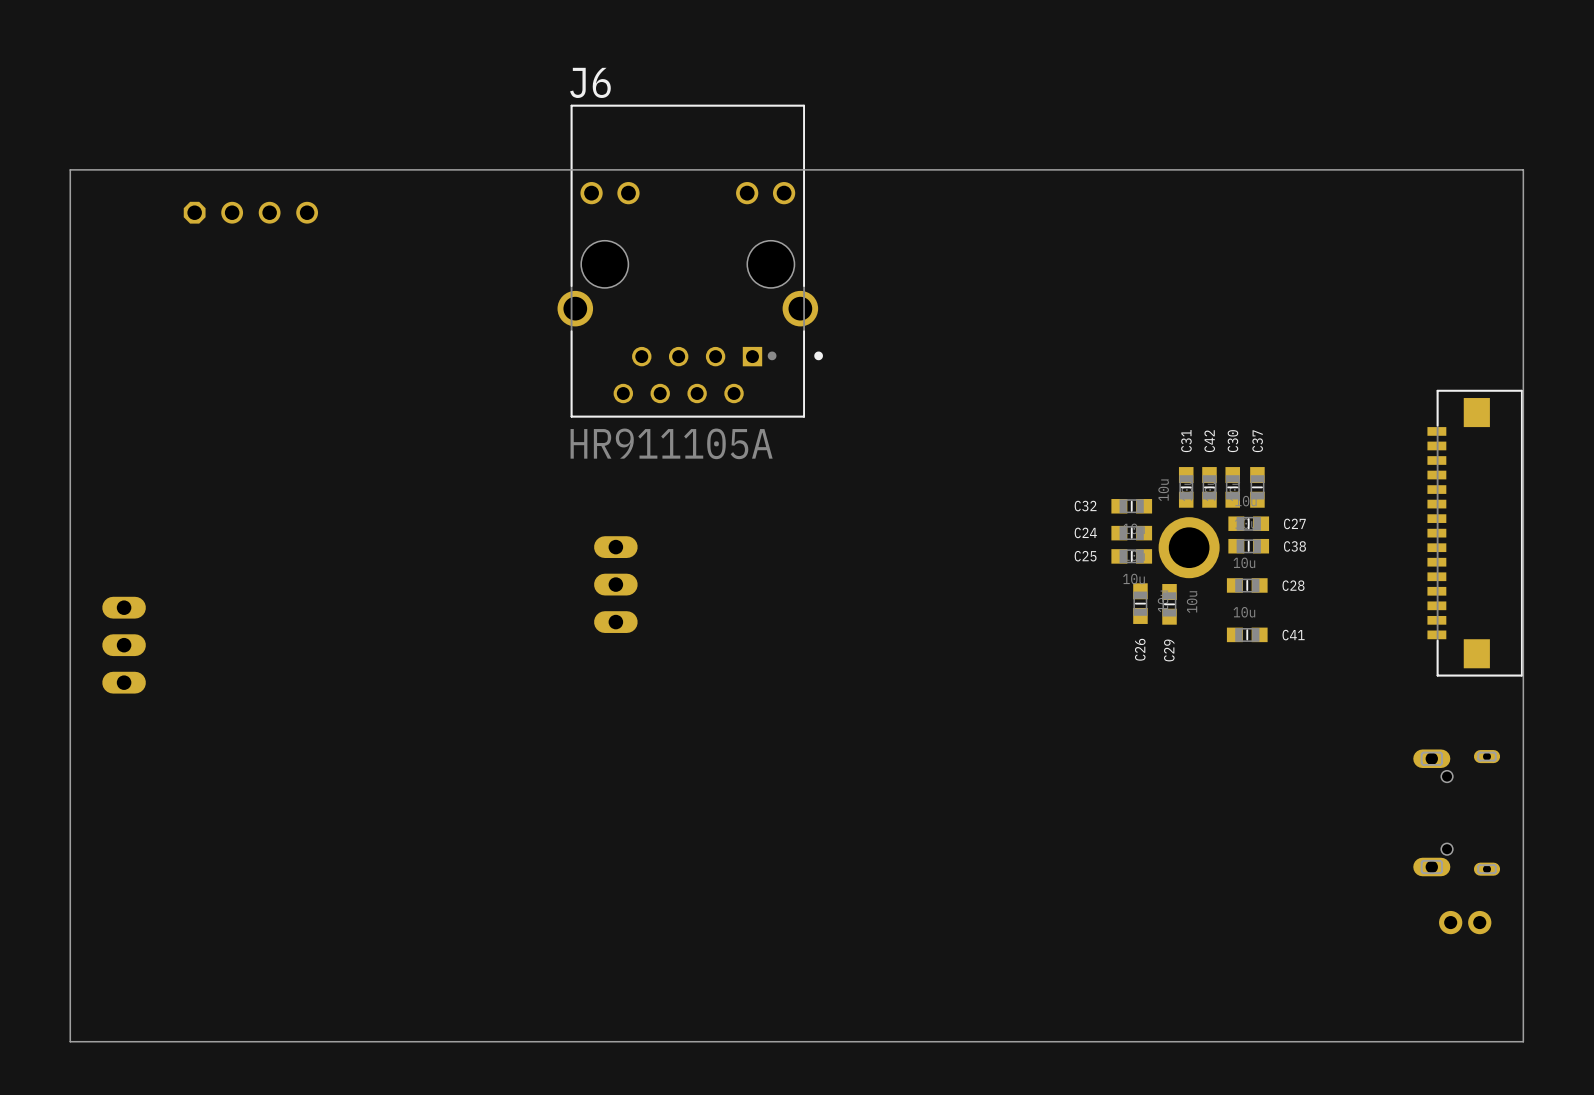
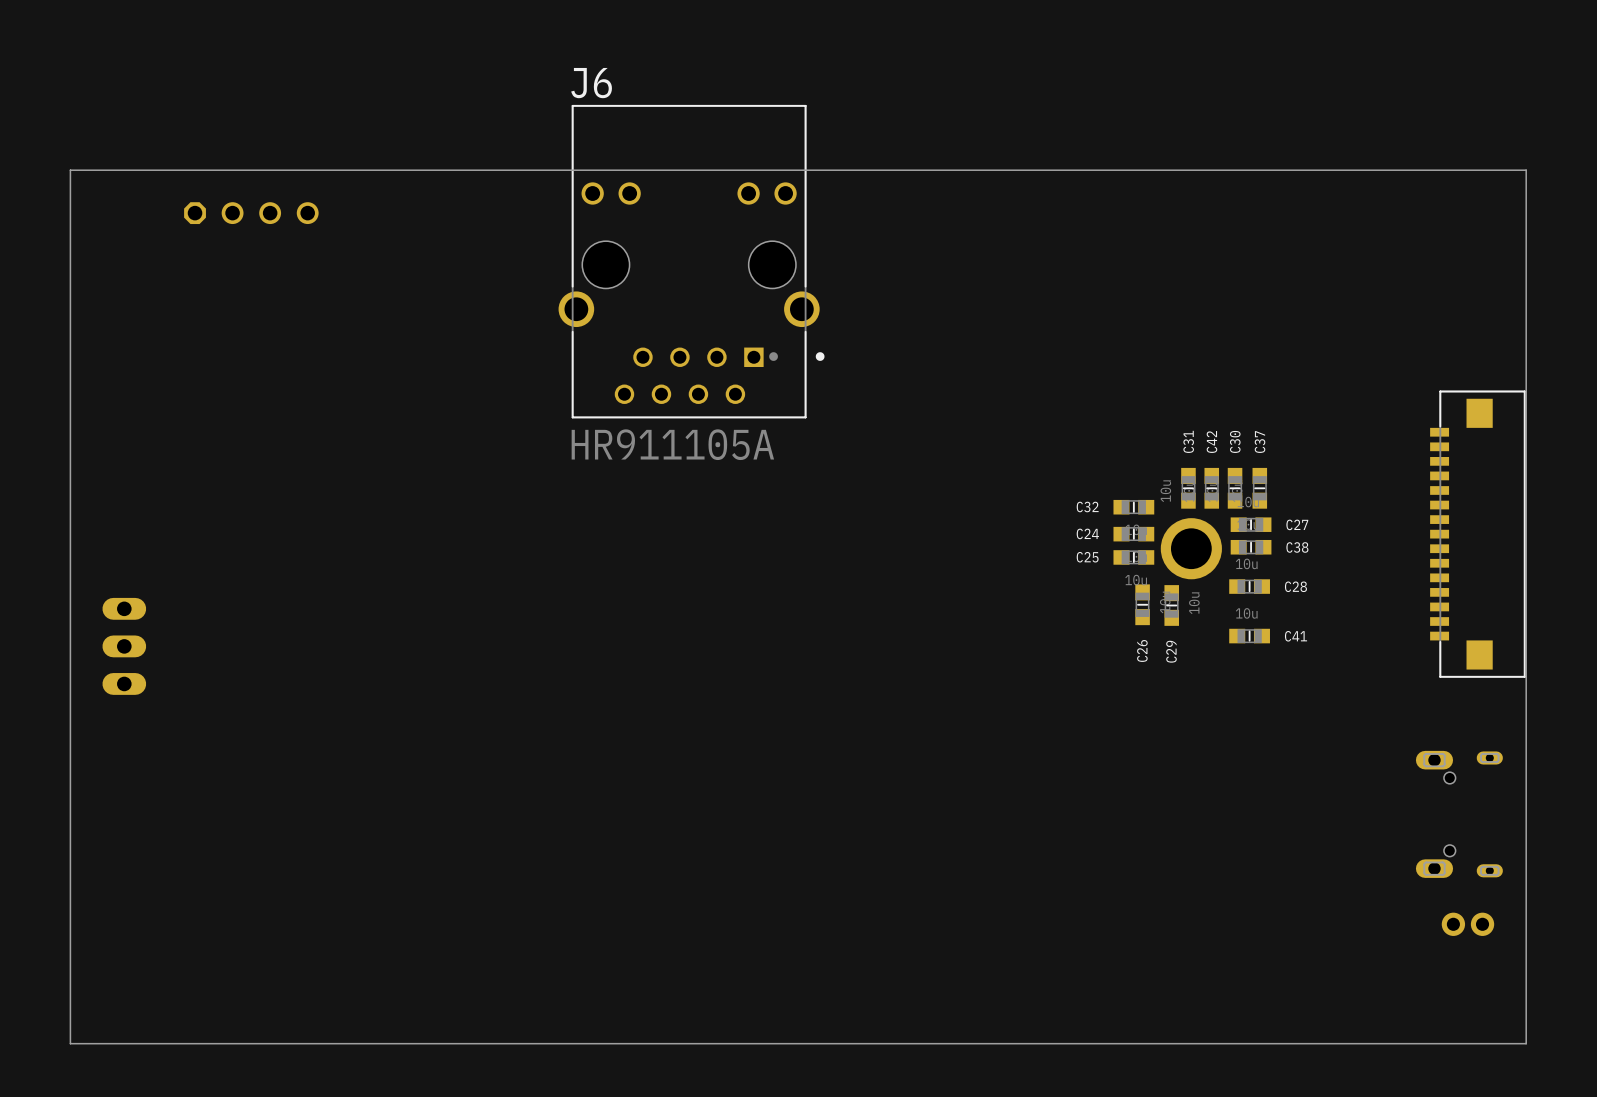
part: (615, 584) -> none

